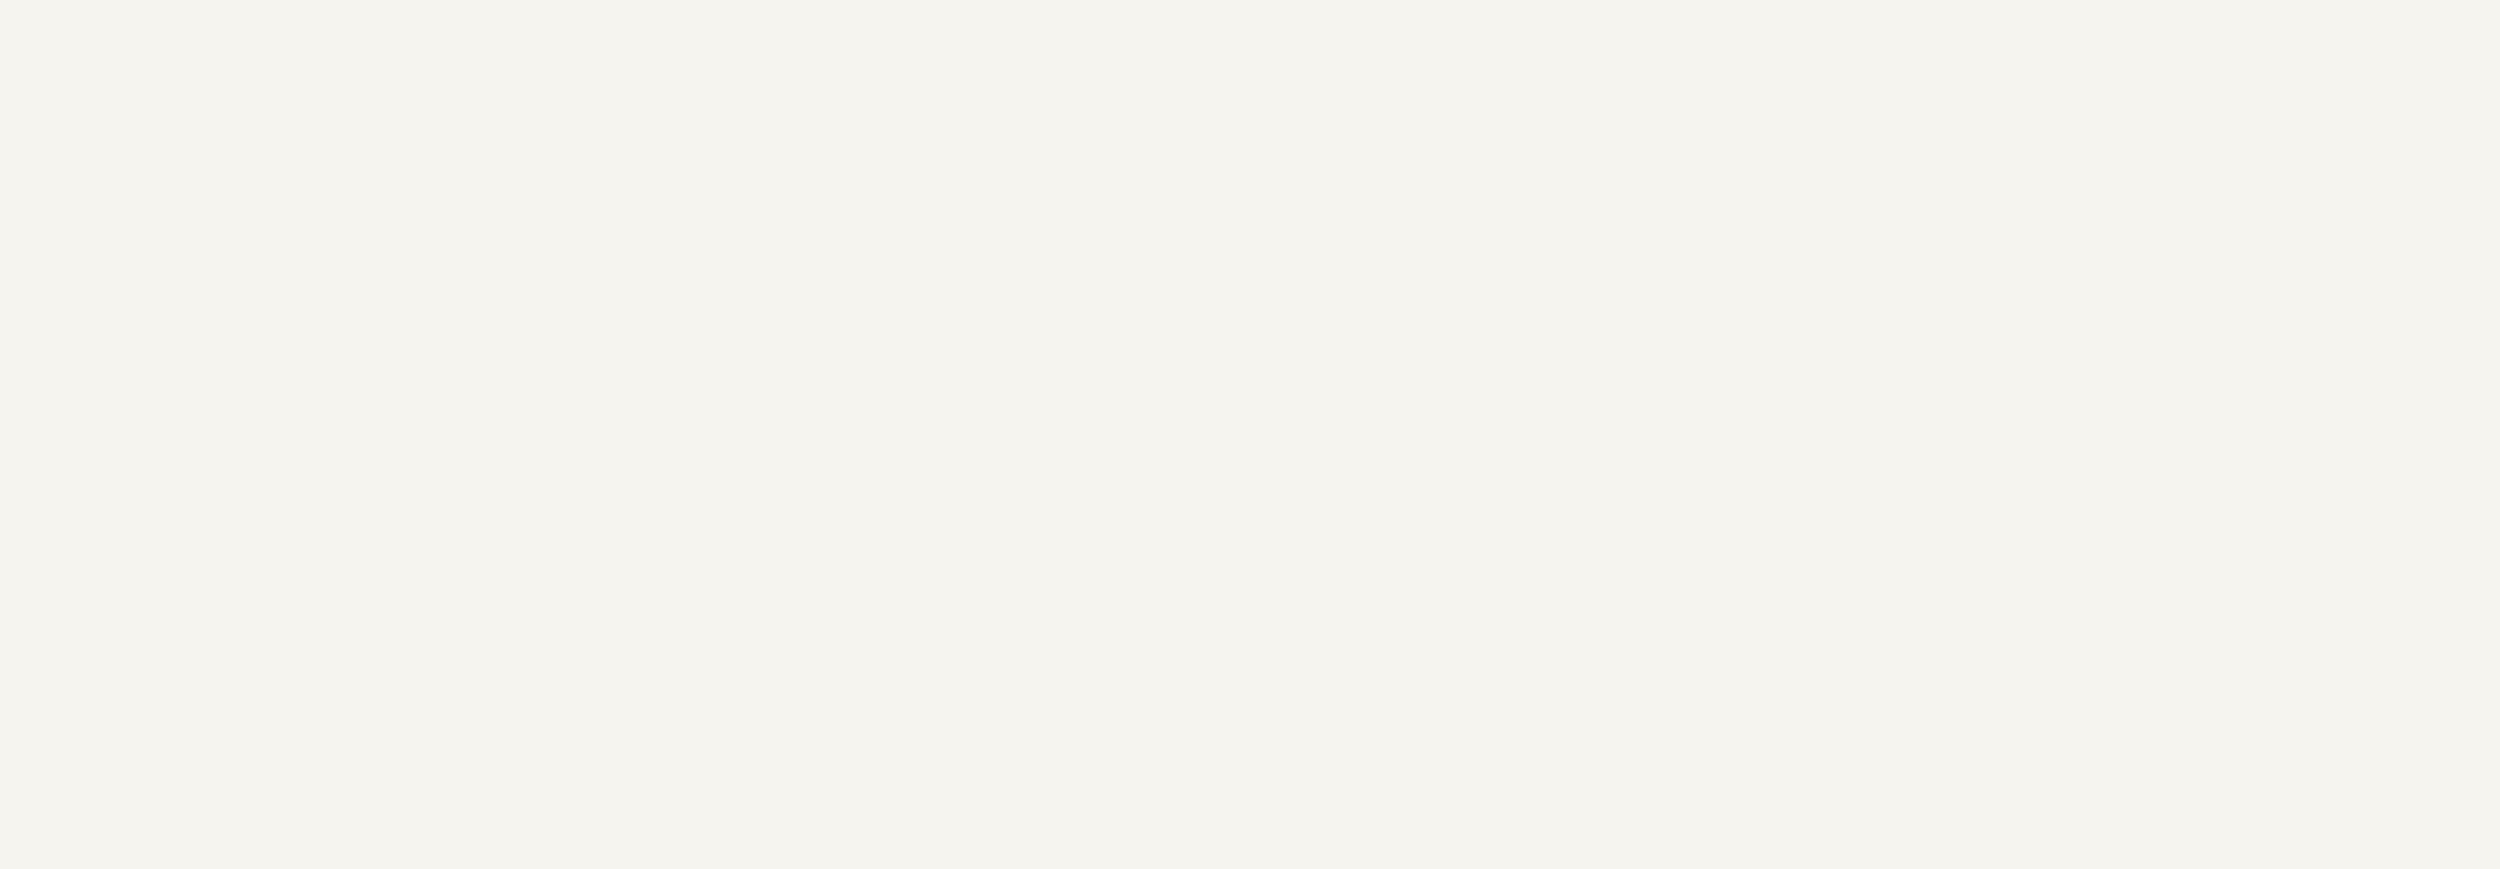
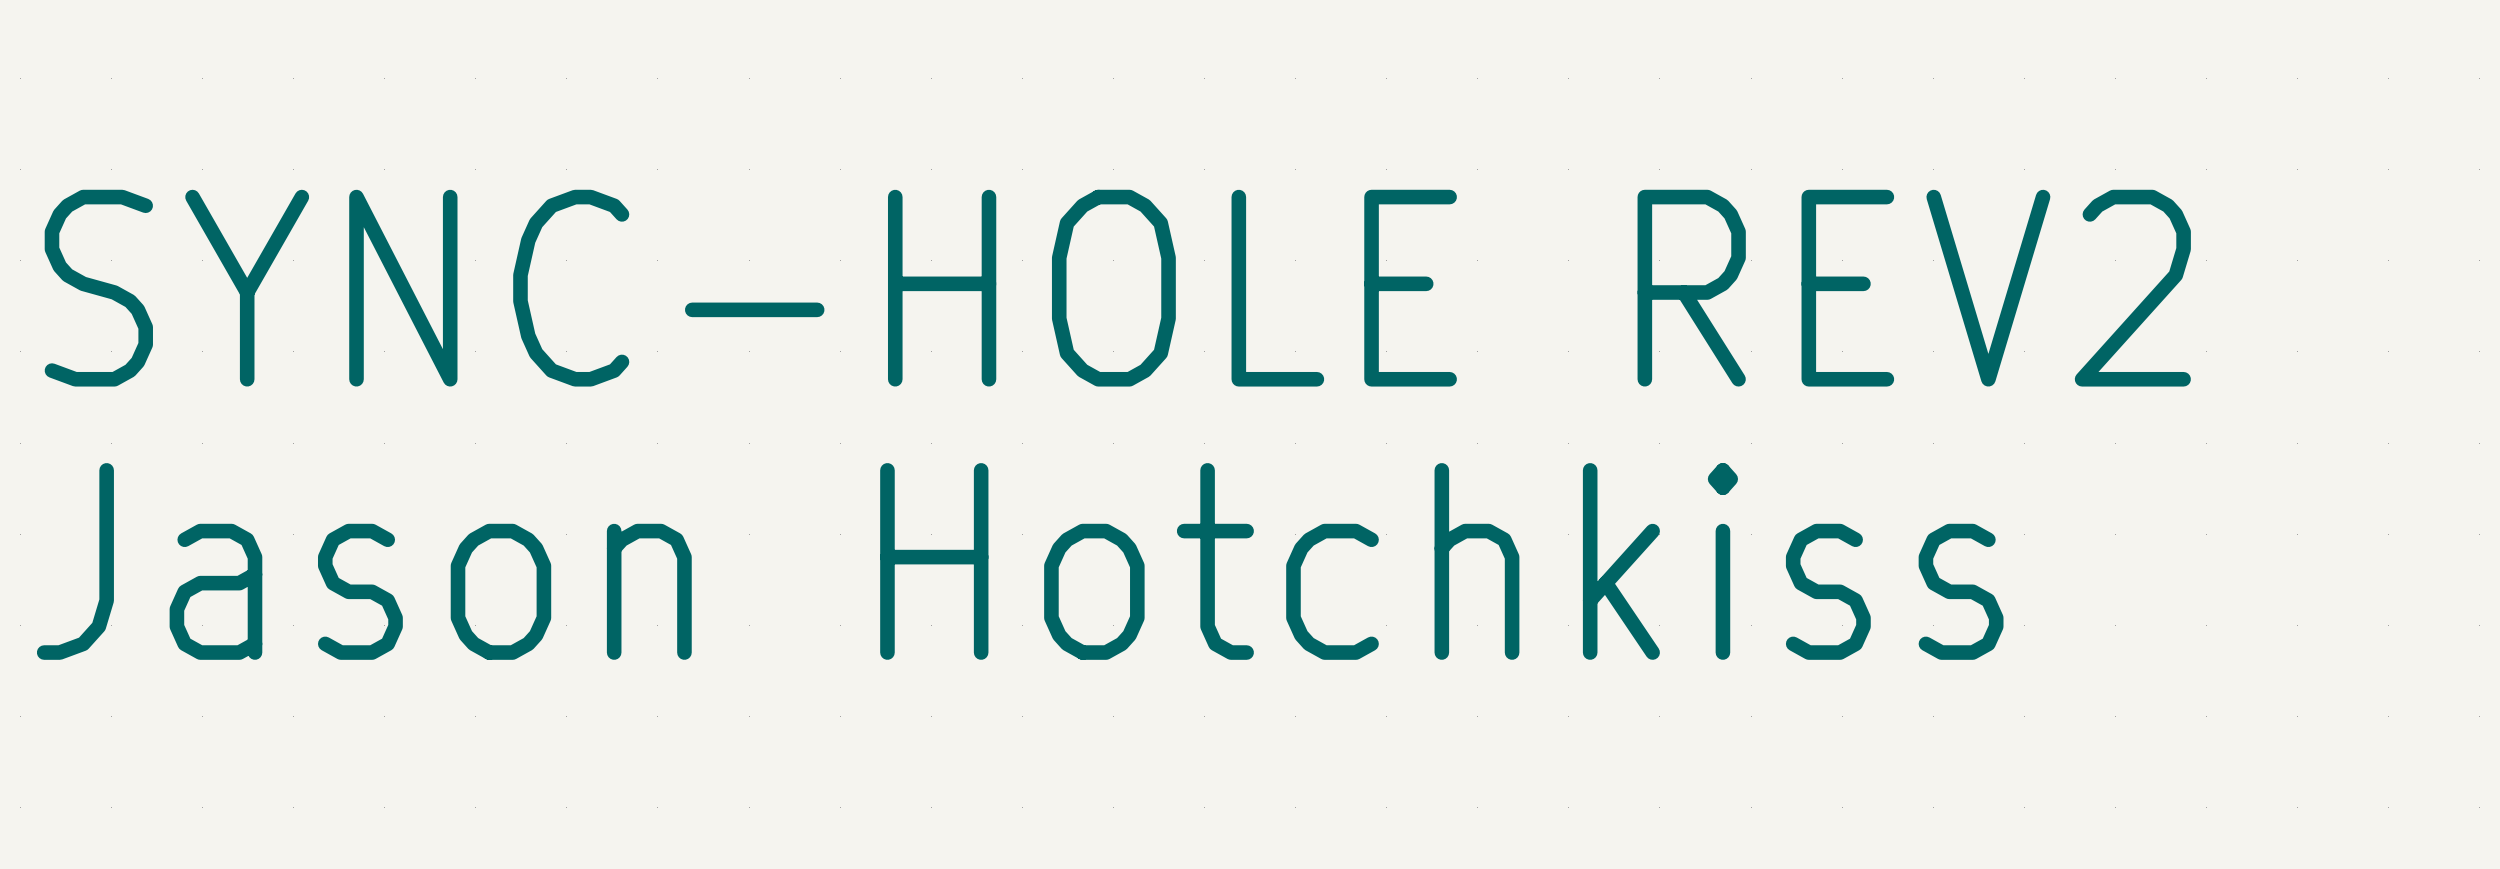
text: none -> SYNC-HOLE REV2 (1117, 288)
text: none -> Jason Hotchkiss (1020, 561)

